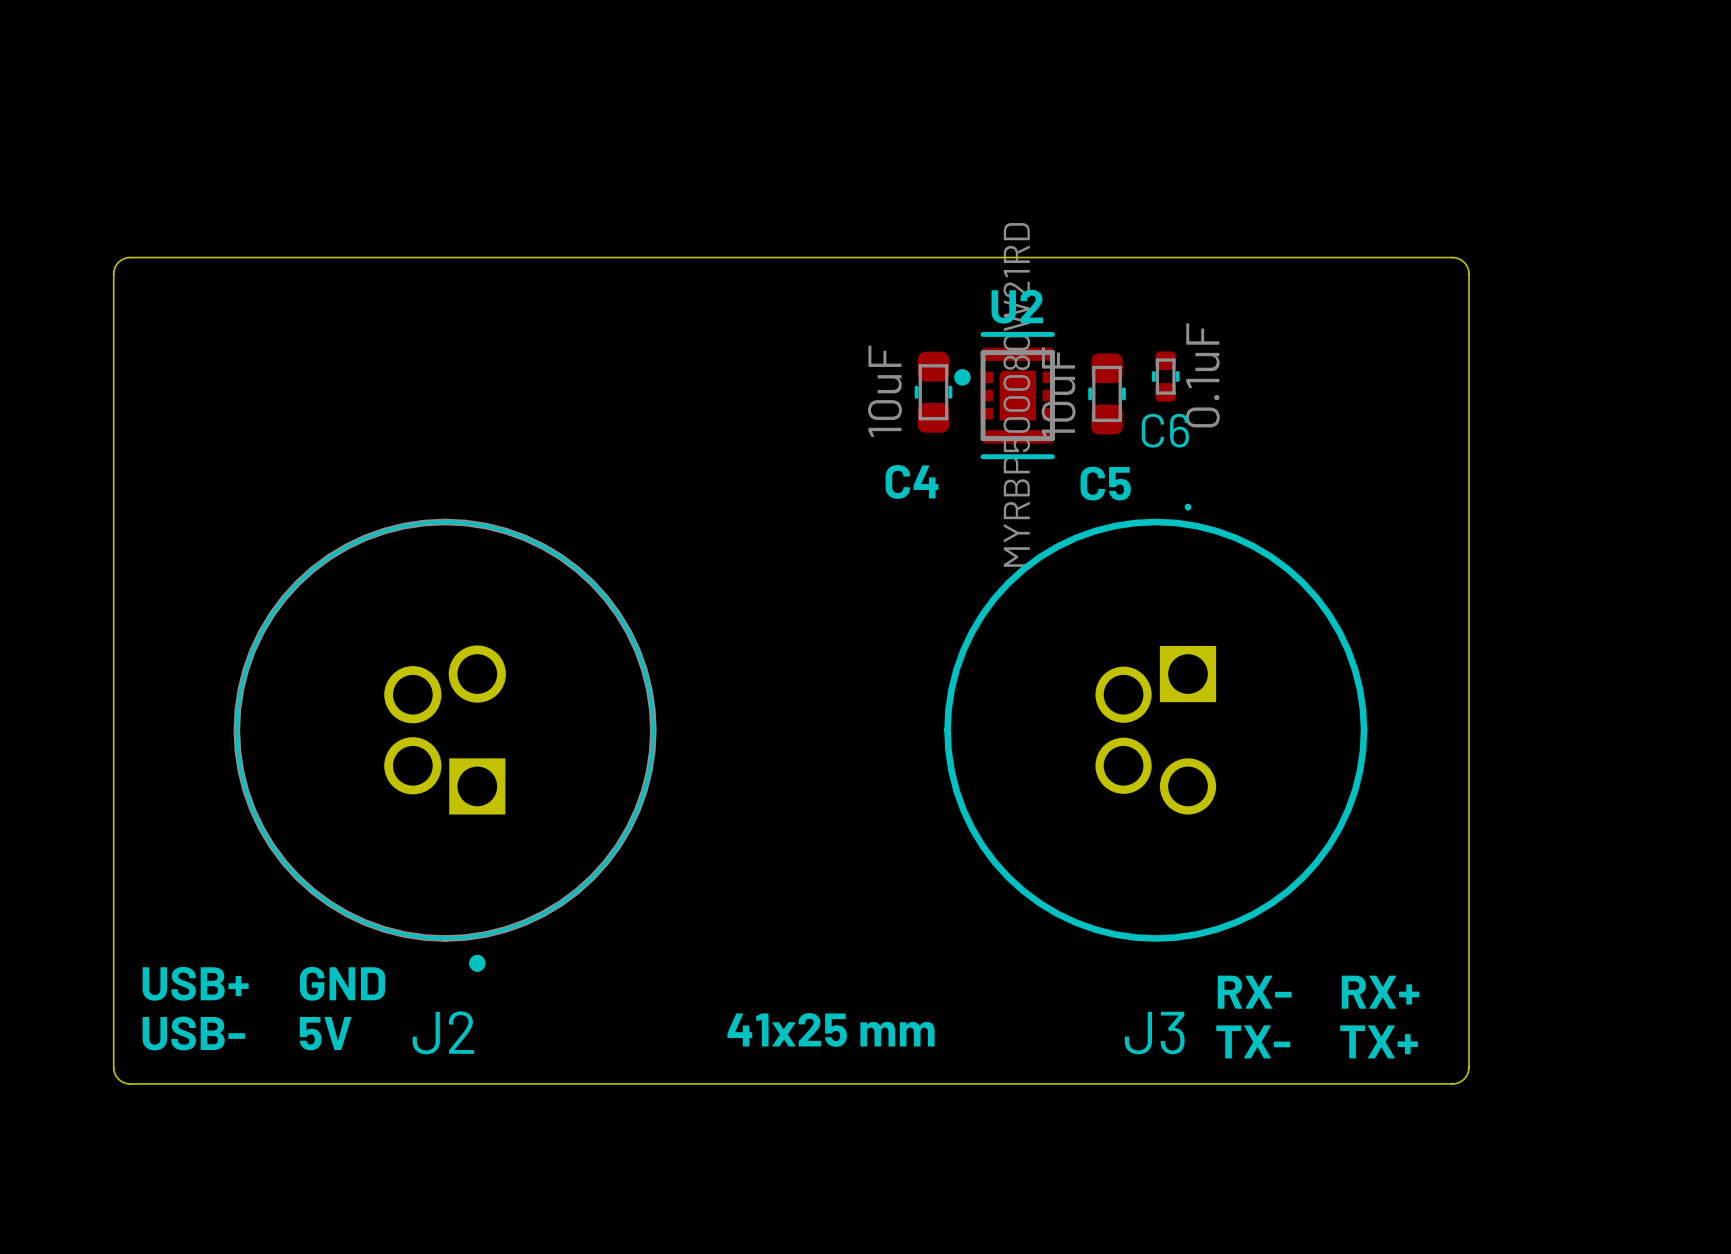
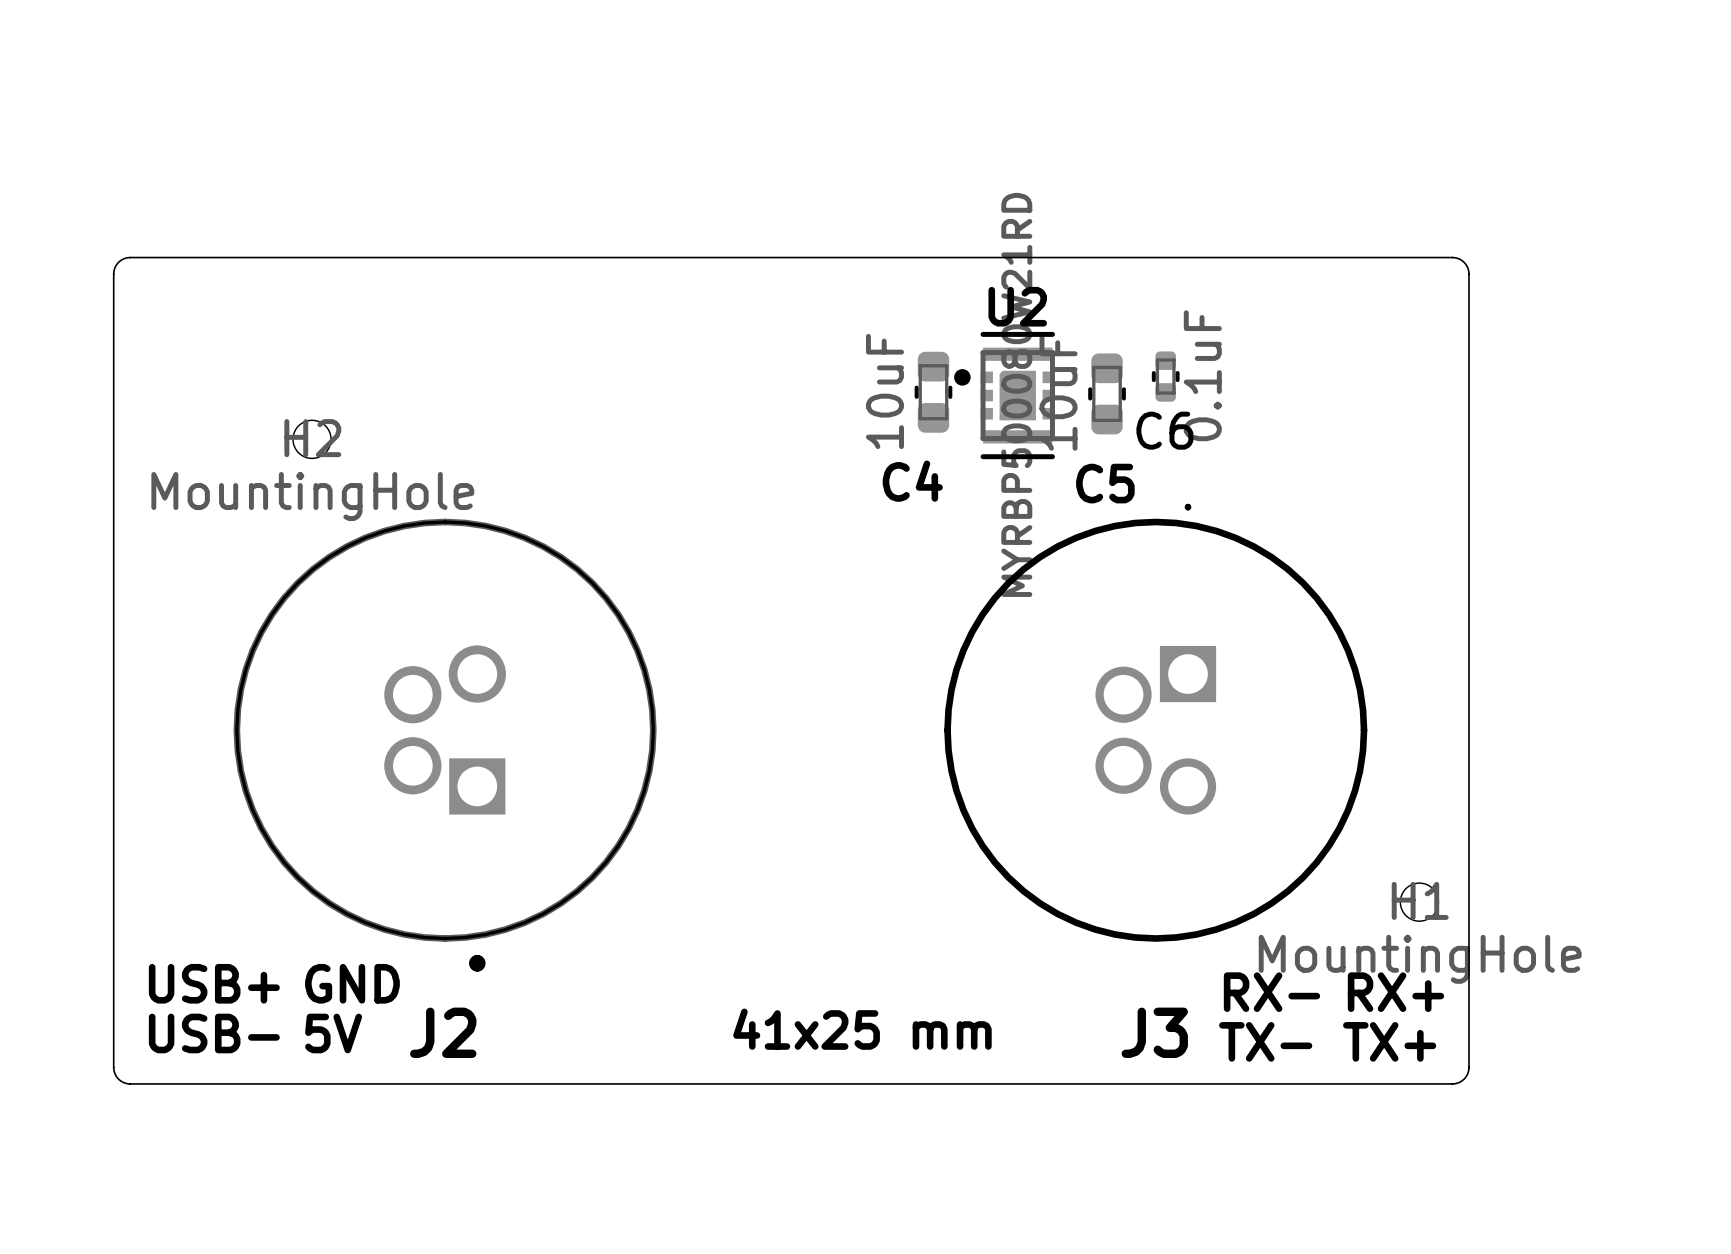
H2: none -> MountingHole (312, 439)
H1: none -> MountingHole (1419, 902)

